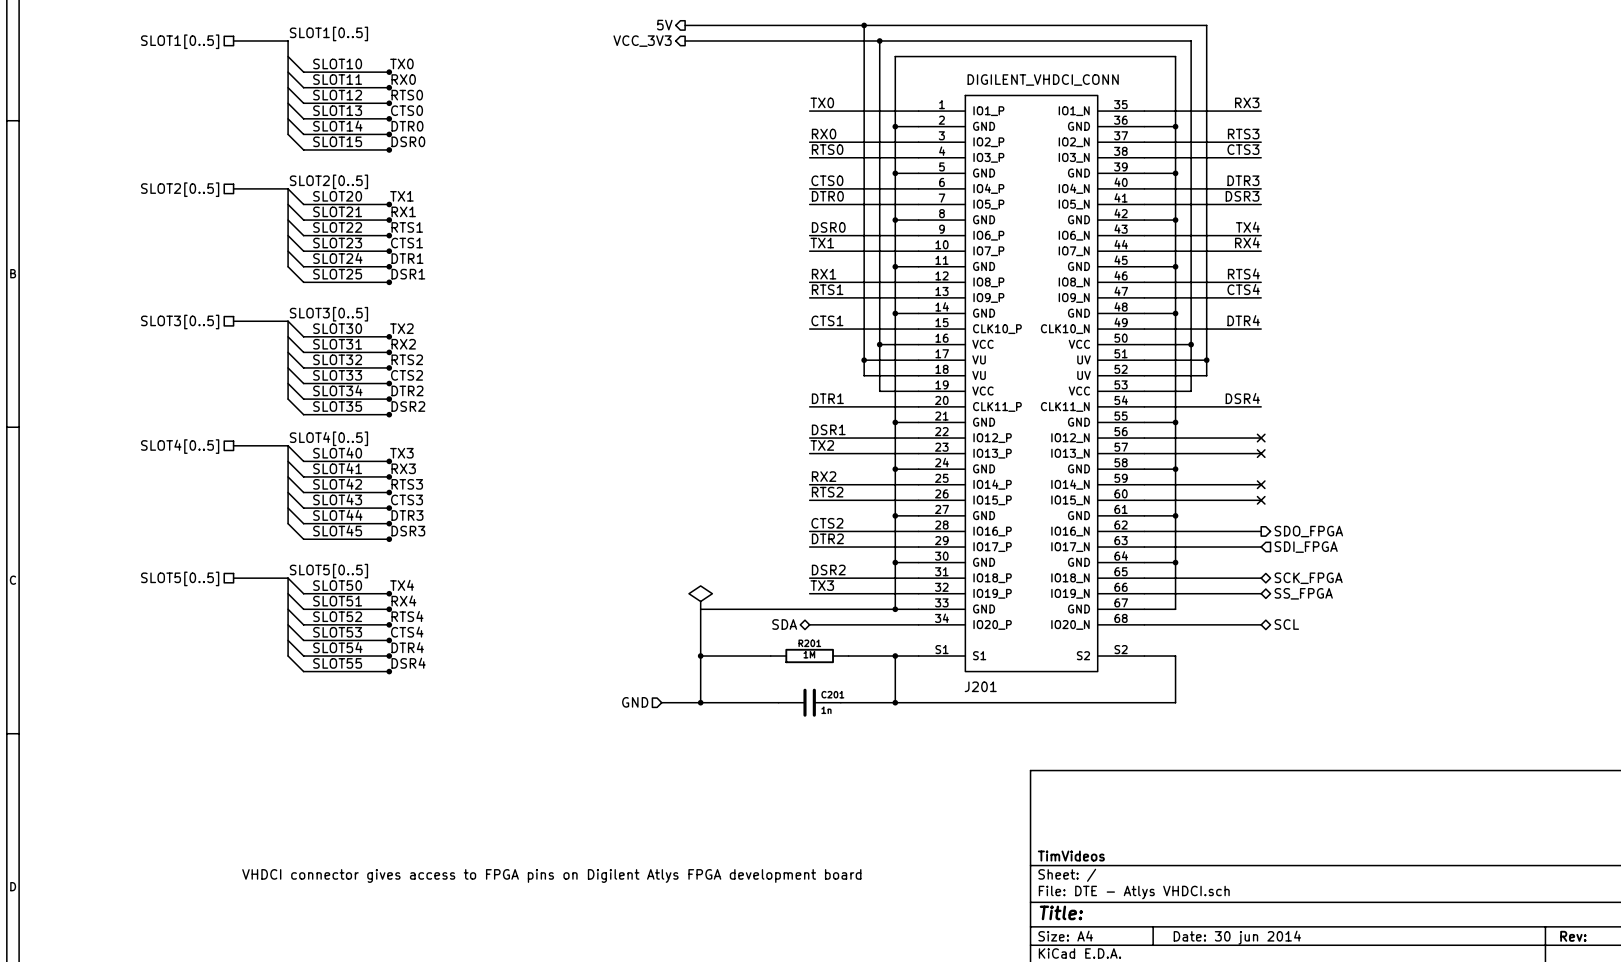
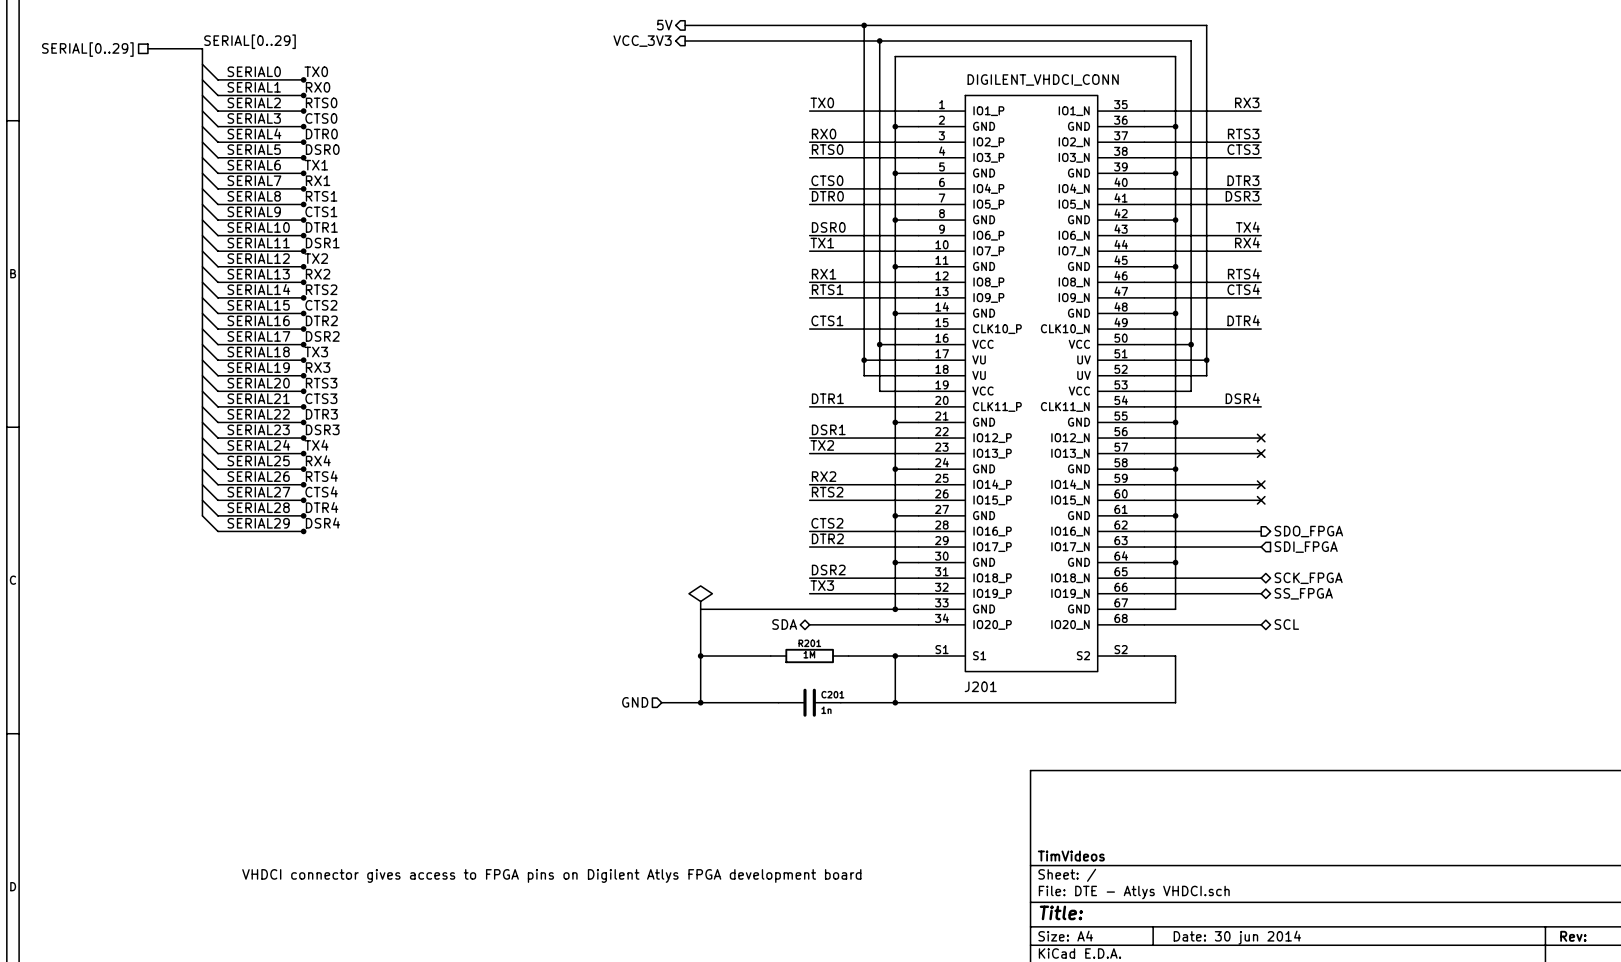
label: SLOT1[0..5] (328, 33) -> none
bus: (233, 40) (288, 40) (288, 134) -> none
hierarchical label: SLOT1[0..5] (180, 41) -> none
label: none -> SERIAL[0..29] (249, 41)
bus: none -> (147, 48) (202, 48) (202, 515)
hierarchical label: none -> SERIAL[0..29] (87, 49)
wire: (288, 56) (303, 72) (389, 72) -> (202, 64) (218, 79) (303, 79)
label: SLOT10 (337, 63) -> none
label position: TX0 (401, 63) -> TX0 (316, 71)
label: none -> SERIAL0 (254, 71)
wire: (288, 72) (303, 87) (389, 87) -> (202, 79) (218, 95) (303, 95)
junction: (389, 72) -> none
junction: none -> (303, 79)
label: SLOT11 (337, 79) -> none
label position: RX0 (403, 79) -> RX0 (318, 87)
label: none -> SERIAL1 (254, 87)
wire: (288, 87) (303, 103) (389, 103) -> (202, 95) (218, 111) (303, 111)
junction: (389, 87) -> none
junction: none -> (303, 95)
label: SLOT12 (337, 95) -> none
label position: RTS0 (407, 95) -> RTS0 (321, 102)
label: none -> SERIAL2 (254, 102)
wire: (288, 103) (303, 118) (389, 118) -> (202, 111) (218, 126) (303, 126)
junction: (389, 103) -> none
label: SLOT13 (337, 110) -> none
label position: CTS0 (407, 110) -> CTS0 (321, 118)
junction: none -> (303, 111)
label: none -> SERIAL3 (254, 118)
wire: (288, 118) (303, 134) (389, 134) -> (202, 126) (218, 142) (303, 142)
junction: (389, 118) -> none
junction: none -> (303, 126)
label: SLOT14 (337, 126) -> none
label position: DTR0 (407, 126) -> DTR0 (321, 134)
label: none -> SERIAL4 (254, 133)
wire: (288, 134) (303, 149) (389, 149) -> (202, 142) (218, 157) (303, 157)
junction: (389, 134) -> none
label: SLOT15 (337, 141) -> none
label position: DSR0 (408, 141) -> DSR0 (322, 149)
junction: none -> (303, 142)
label: none -> SERIAL5 (254, 149)
junction: (389, 149) -> none
junction: none -> (303, 157)
label: none -> SERIAL6 (254, 165)
junction: none -> (303, 173)
label: none -> SERIAL7 (254, 180)
label: SLOT2[0..5] (328, 181) -> none
bus: (233, 188) (288, 188) (288, 266) -> none
wire: (288, 188) (303, 204) (389, 204) -> (202, 188) (218, 204) (303, 204)
junction: none -> (303, 188)
hierarchical label: SLOT2[0..5] (180, 189) -> none
label: none -> SERIAL8 (254, 196)
label: SLOT20 (337, 196) -> none
label position: TX1 (401, 196) -> TX1 (316, 165)
wire: (288, 204) (303, 220) (389, 220) -> (202, 204) (218, 220) (303, 220)
junction: none -> (303, 204)
junction: (389, 204) -> none
label: none -> SERIAL9 (254, 211)
label: SLOT21 (337, 211) -> none
label position: RX1 (403, 211) -> RX1 (318, 180)
wire: (288, 220) (303, 235) (389, 235) -> (202, 220) (218, 235) (303, 235)
junction: none -> (303, 220)
junction: (389, 220) -> none
label: none -> SERIAL10 (258, 227)
label: SLOT22 (337, 227) -> none
label position: RTS1 (407, 227) -> RTS1 (321, 196)
wire: (288, 235) (303, 251) (389, 251) -> (202, 235) (218, 251) (303, 251)
junction: none -> (303, 235)
junction: (389, 235) -> none
label: none -> SERIAL11 (258, 243)
label: SLOT23 (337, 243) -> none
label position: CTS1 (407, 243) -> CTS1 (321, 211)
wire: none -> (202, 251) (218, 266) (303, 266)
wire: (288, 251) (303, 266) (389, 266) -> (202, 173) (218, 188) (303, 188)
junction: none -> (303, 251)
junction: (389, 251) -> none
label: none -> SERIAL12 (258, 258)
label: SLOT24 (337, 258) -> none
label position: DTR1 (407, 258) -> DTR1 (321, 227)
wire: none -> (202, 266) (218, 282) (303, 282)
wire: (288, 266) (303, 282) (389, 282) -> (202, 157) (218, 173) (303, 173)
junction: none -> (303, 266)
junction: (389, 266) -> none
label: none -> SERIAL13 (258, 274)
label: SLOT25 (337, 274) -> none
label position: DSR1 (408, 274) -> DSR1 (322, 243)
wire: none -> (202, 282) (218, 297) (303, 297)
junction: none -> (303, 282)
junction: (389, 282) -> none
label: none -> SERIAL14 (258, 289)
wire: none -> (202, 297) (218, 313) (303, 313)
junction: none -> (303, 297)
label: none -> SERIAL15 (258, 305)
junction: none -> (303, 313)
label: SLOT3[0..5] (328, 314) -> none
label: none -> SERIAL16 (258, 320)
bus: (233, 321) (288, 321) (288, 399) -> none
wire: (288, 321) (303, 336) (389, 336) -> (202, 313) (218, 329) (303, 329)
hierarchical label: SLOT3[0..5] (180, 322) -> none
label: SLOT30 (337, 328) -> none
label position: TX2 (401, 328) -> TX2 (316, 258)
junction: none -> (303, 329)
label: none -> SERIAL17 (258, 336)
wire: (288, 336) (303, 352) (389, 352) -> (202, 329) (218, 344) (303, 344)
junction: (389, 336) -> none
junction: none -> (303, 344)
label: SLOT31 (337, 344) -> none
label position: RX2 (403, 344) -> RX2 (318, 274)
label: none -> SERIAL18 (258, 352)
wire: (288, 352) (303, 367) (389, 367) -> (202, 344) (218, 360) (303, 360)
junction: (389, 352) -> none
label: SLOT32 (337, 359) -> none
label position: RTS2 (407, 359) -> RTS2 (321, 289)
junction: none -> (303, 360)
label: none -> SERIAL19 (258, 367)
wire: (288, 367) (303, 383) (389, 383) -> (202, 360) (218, 375) (303, 375)
junction: (389, 367) -> none
junction: none -> (303, 375)
label: SLOT33 (337, 375) -> none
label position: CTS2 (407, 375) -> CTS2 (321, 305)
label: none -> SERIAL20 (258, 383)
wire: (288, 383) (303, 399) (389, 399) -> (202, 375) (218, 391) (303, 391)
junction: (389, 383) -> none
label: SLOT34 (337, 390) -> none
label position: DTR2 (407, 390) -> DTR2 (321, 320)
junction: none -> (303, 391)
label: none -> SERIAL21 (258, 398)
wire: (288, 399) (303, 414) (389, 414) -> (202, 391) (218, 406) (303, 406)
junction: (389, 399) -> none
wire: none -> (202, 406) (218, 422) (303, 422)
junction: none -> (303, 406)
label: SLOT35 (337, 406) -> none
label position: DSR2 (408, 406) -> DSR2 (322, 336)
label: none -> SERIAL22 (258, 414)
junction: (389, 414) -> none
wire: none -> (202, 422) (218, 438) (303, 438)
junction: none -> (303, 422)
label: none -> SERIAL23 (258, 429)
junction: none -> (303, 438)
label: SLOT4[0..5] (328, 438) -> none
bus: (233, 445) (288, 445) (288, 523) -> none
label: none -> SERIAL24 (258, 445)
wire: (288, 445) (303, 461) (389, 461) -> (202, 438) (218, 453) (303, 453)
label: none -> TX4 (316, 445)
hierarchical label: SLOT4[0..5] (180, 446) -> none
junction: none -> (303, 453)
label: SLOT40 (337, 453) -> none
label position: TX3 (401, 453) -> TX3 (316, 352)
label: none -> RX4 (318, 460)
label: none -> SERIAL25 (258, 461)
wire: (288, 461) (303, 476) (389, 476) -> (202, 453) (218, 469) (303, 469)
junction: (389, 461) -> none
label: SLOT41 (337, 468) -> none
label position: RX3 (403, 468) -> RX3 (318, 367)
junction: none -> (303, 469)
label: none -> SERIAL26 (258, 476)
wire: (288, 476) (303, 492) (389, 492) -> (202, 469) (218, 484) (303, 484)
label: none -> RTS4 (321, 476)
junction: (389, 476) -> none
junction: none -> (303, 484)
label: SLOT42 (337, 484) -> none
label position: RTS3 (407, 484) -> RTS3 (321, 383)
label: none -> CTS4 (321, 491)
label: none -> SERIAL27 (258, 492)
wire: (288, 492) (303, 508) (389, 508) -> (202, 484) (218, 500) (303, 500)
junction: (389, 492) -> none
label: SLOT43 (337, 499) -> none
label position: CTS3 (407, 499) -> CTS3 (321, 398)
junction: none -> (303, 500)
label: none -> SERIAL28 (258, 507)
label: none -> DTR4 (322, 507)
wire: (288, 508) (303, 523) (389, 523) -> (202, 500) (218, 515) (303, 515)
junction: (389, 508) -> none
junction: none -> (303, 515)
label: SLOT44 (337, 515) -> none
label position: DTR3 (407, 515) -> DTR3 (321, 414)
label: none -> SERIAL29 (258, 523)
wire: (288, 523) (303, 539) (389, 539) -> (202, 515) (218, 531) (303, 531)
label: none -> DSR4 (322, 523)
junction: (389, 523) -> none
label: SLOT45 (337, 530) -> none
junction: none -> (303, 531)
label position: DSR3 (408, 531) -> DSR3 (322, 429)
junction: (389, 539) -> none
label: SLOT5[0..5] (328, 571) -> none
hierarchical label: SLOT5[0..5] (180, 578) -> none
bus: (233, 578) (288, 578) (288, 656) -> none
wire: (288, 578) (303, 593) (389, 593) -> none
label: SLOT50 (337, 585) -> none
label: TX4 (402, 585) -> none
wire: (288, 593) (303, 609) (389, 609) -> none
junction: (389, 593) -> none
label: RX4 (403, 600) -> none
label: SLOT51 (337, 601) -> none
wire: (288, 609) (303, 624) (389, 624) -> none
junction: (389, 609) -> none
label: SLOT52 (337, 616) -> none
label: RTS4 (407, 616) -> none
wire: (288, 624) (303, 640) (389, 640) -> none
junction: (389, 624) -> none
label: SLOT53 (337, 632) -> none
label: CTS4 (407, 632) -> none
wire: (288, 640) (303, 656) (389, 656) -> none
junction: (389, 640) -> none
label: SLOT54 (337, 647) -> none
label: DTR4 (407, 647) -> none
wire: (288, 656) (303, 671) (389, 671) -> none
junction: (389, 656) -> none
label: SLOT55 (337, 663) -> none
label: DSR4 (408, 663) -> none
junction: (389, 671) -> none

